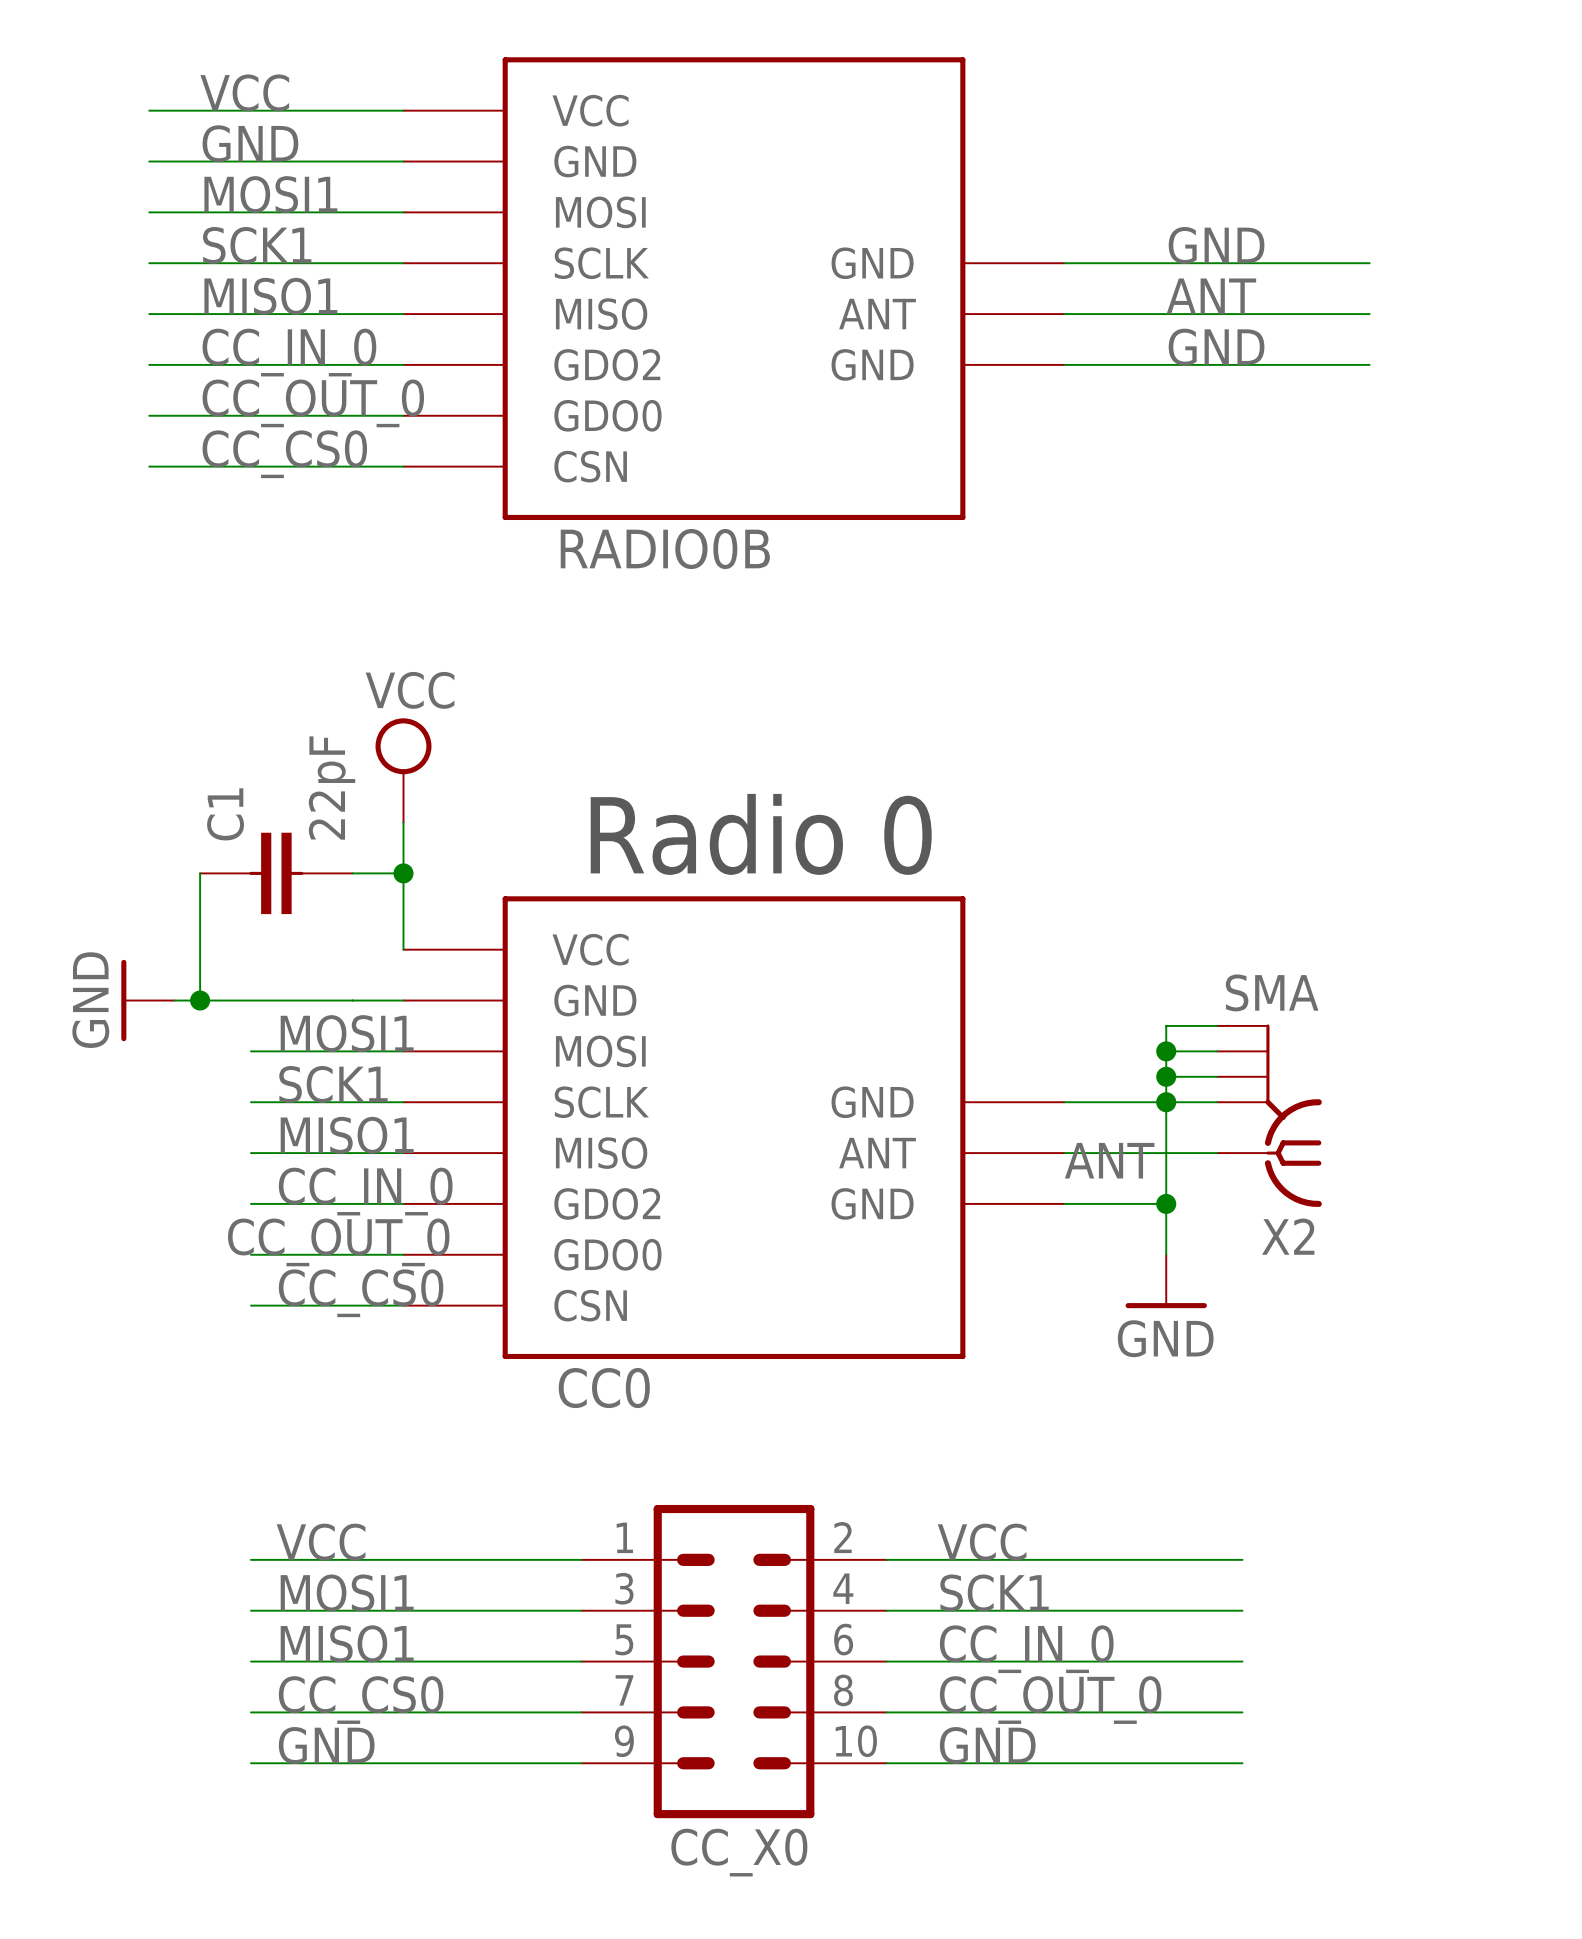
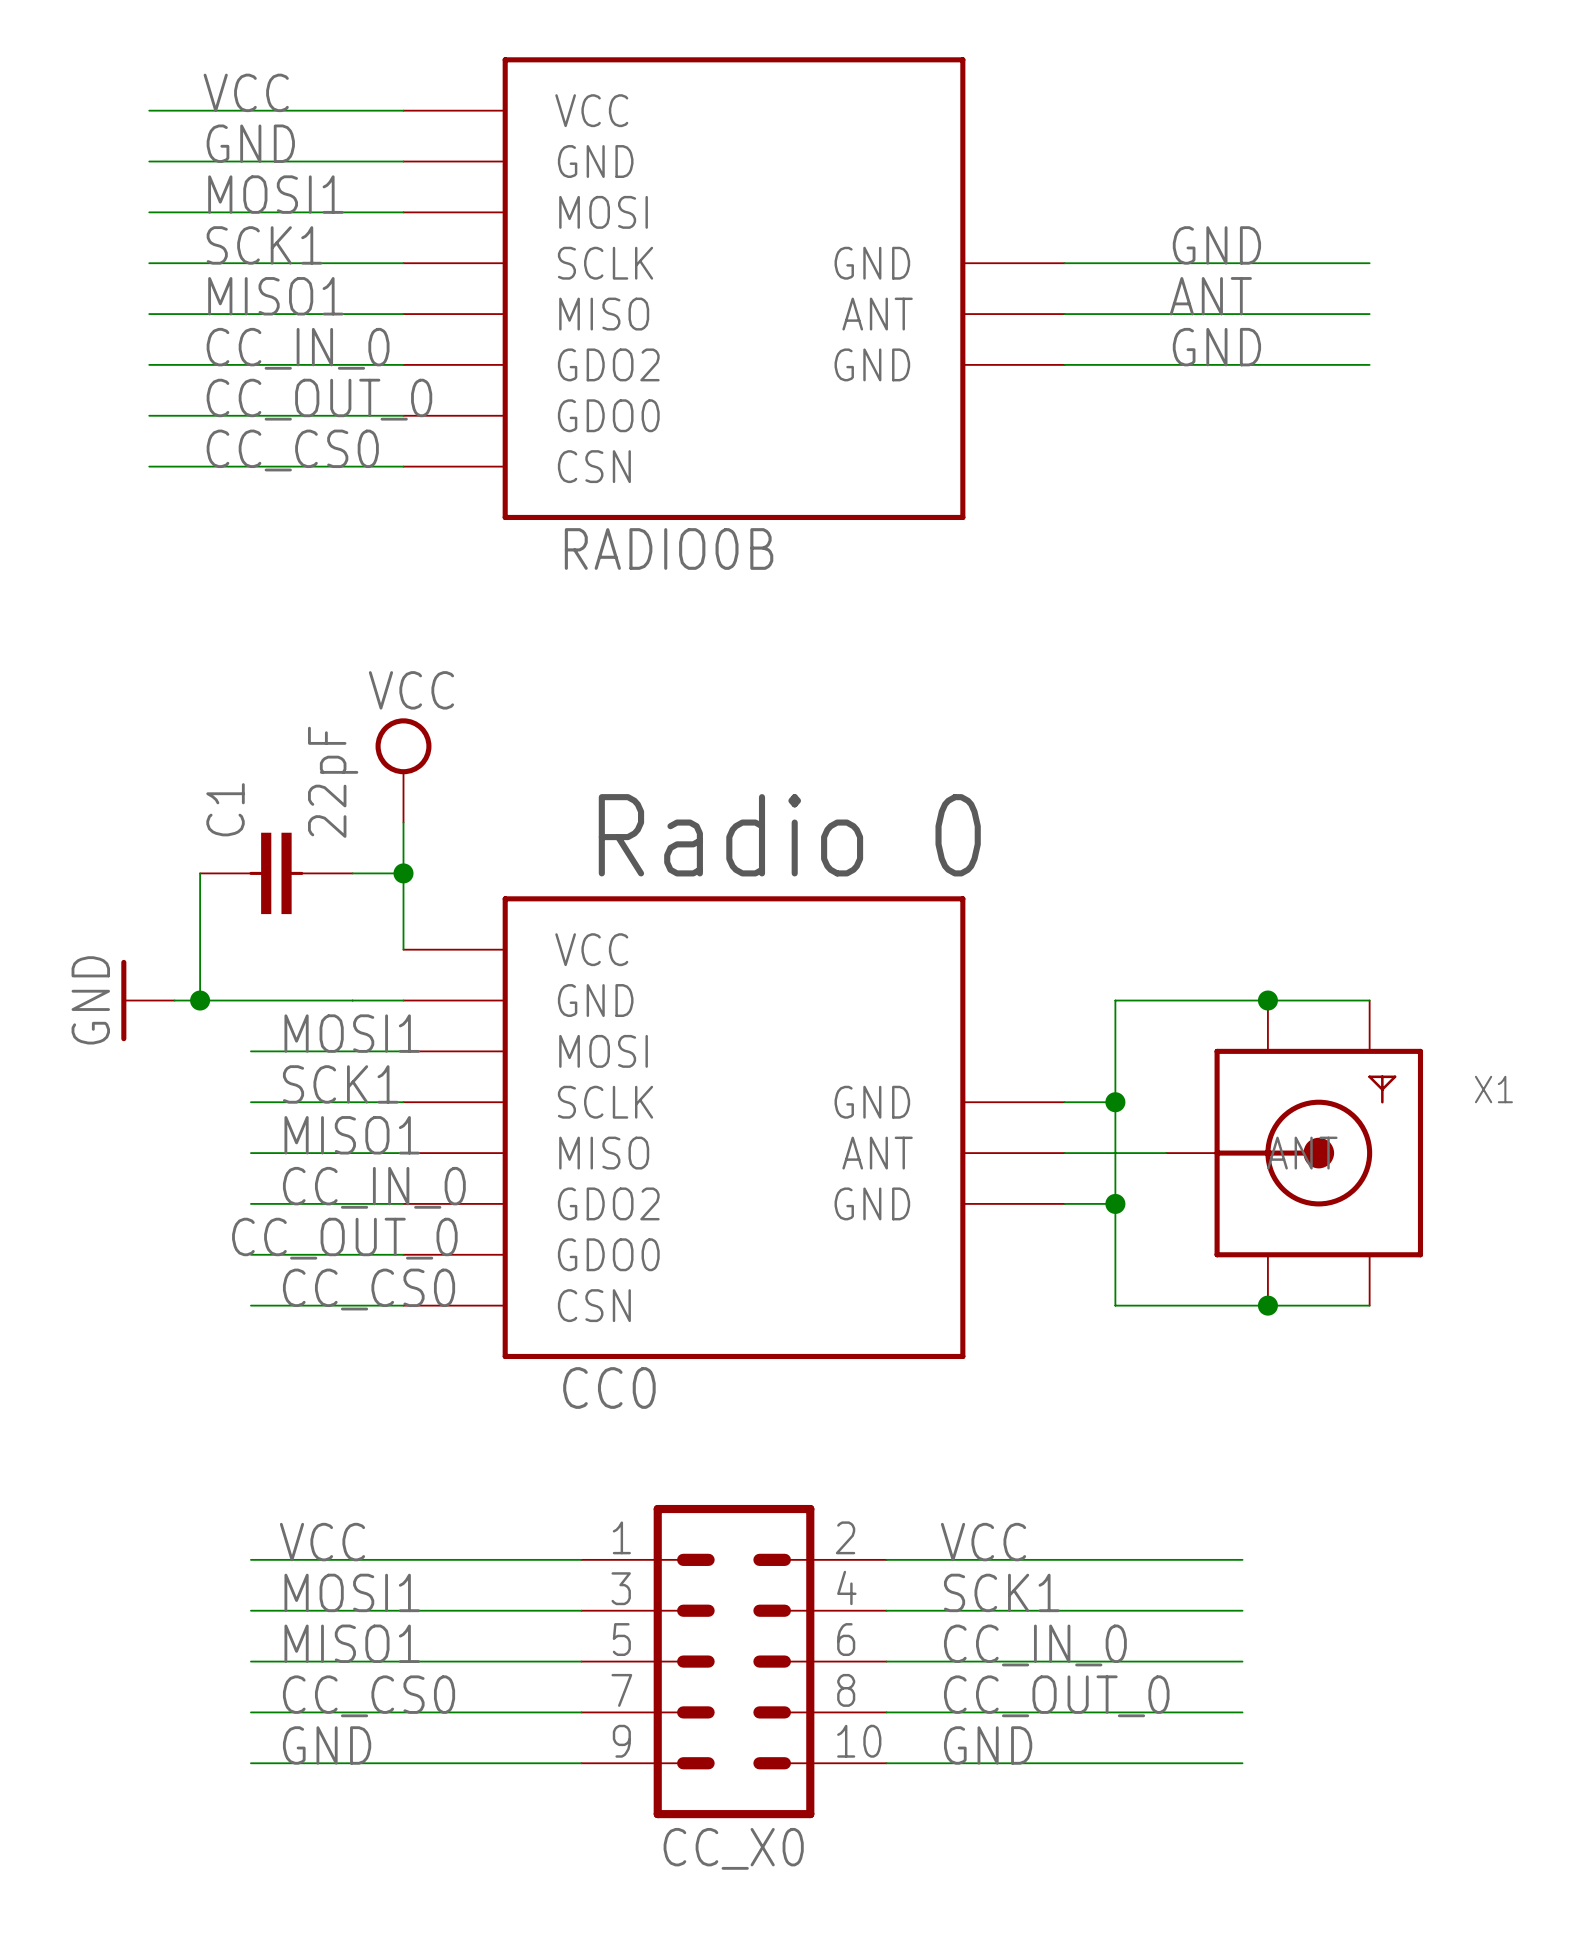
junction: none -> (1267, 1000)
wire: none -> (1369, 1000) (1115, 1000) (1115, 1305) (1369, 1305)
wire: (1217, 1025) (1166, 1025) (1166, 1254) -> none
wire: (1166, 1051) (1217, 1051) -> none
junction: (1166, 1051) -> none
wire: (1166, 1076) (1217, 1076) -> none
junction: (1166, 1076) -> none
wire: (1115, 1102) (1217, 1102) -> none
junction: none -> (1115, 1102)
junction: (1166, 1102) -> none
X2: SMA (1269, 1115) -> none
X1: none -> (1294, 1153)
label: ANT (1109, 1160) -> none
wire: (1115, 1203) (1166, 1203) -> none
junction position: (1166, 1203) -> (1115, 1203)
power symbol: GND (1166, 1281) -> none
junction: none -> (1267, 1305)

